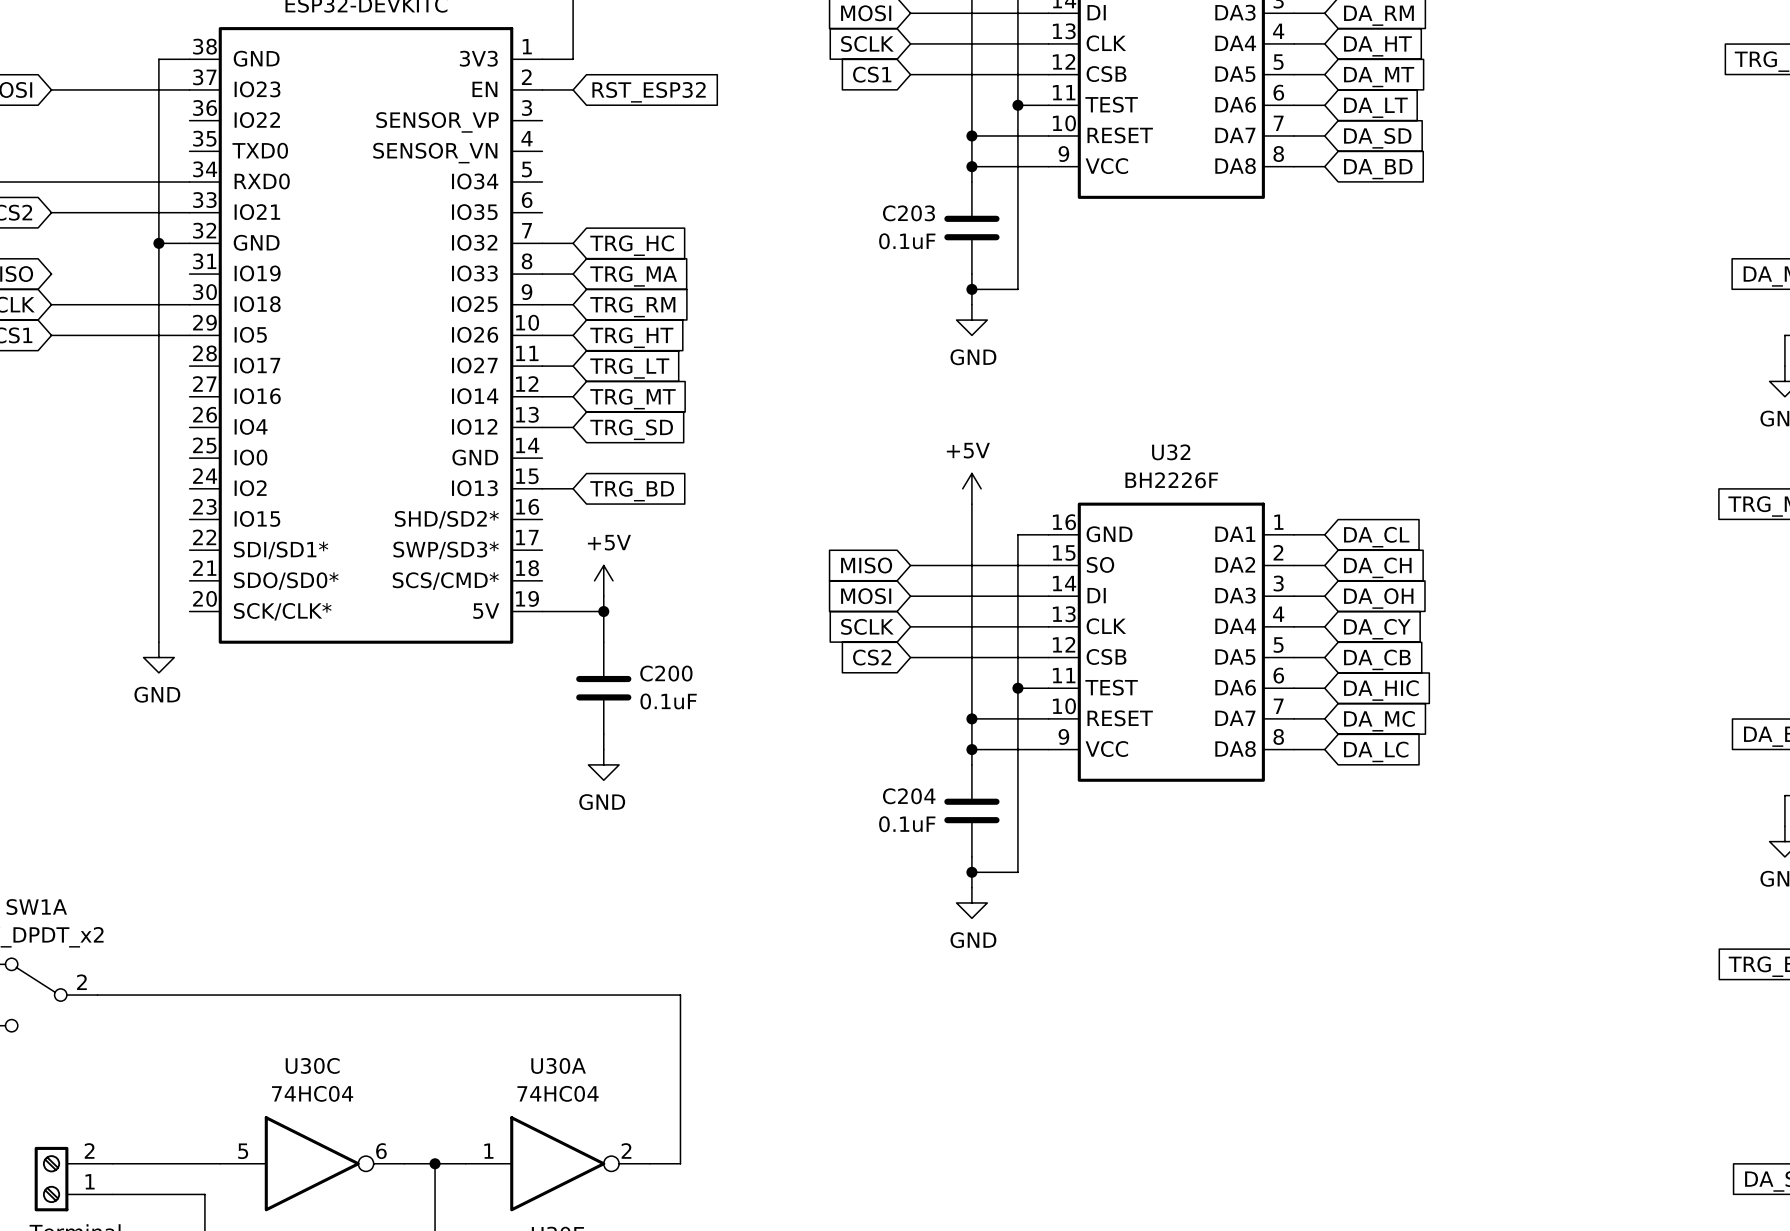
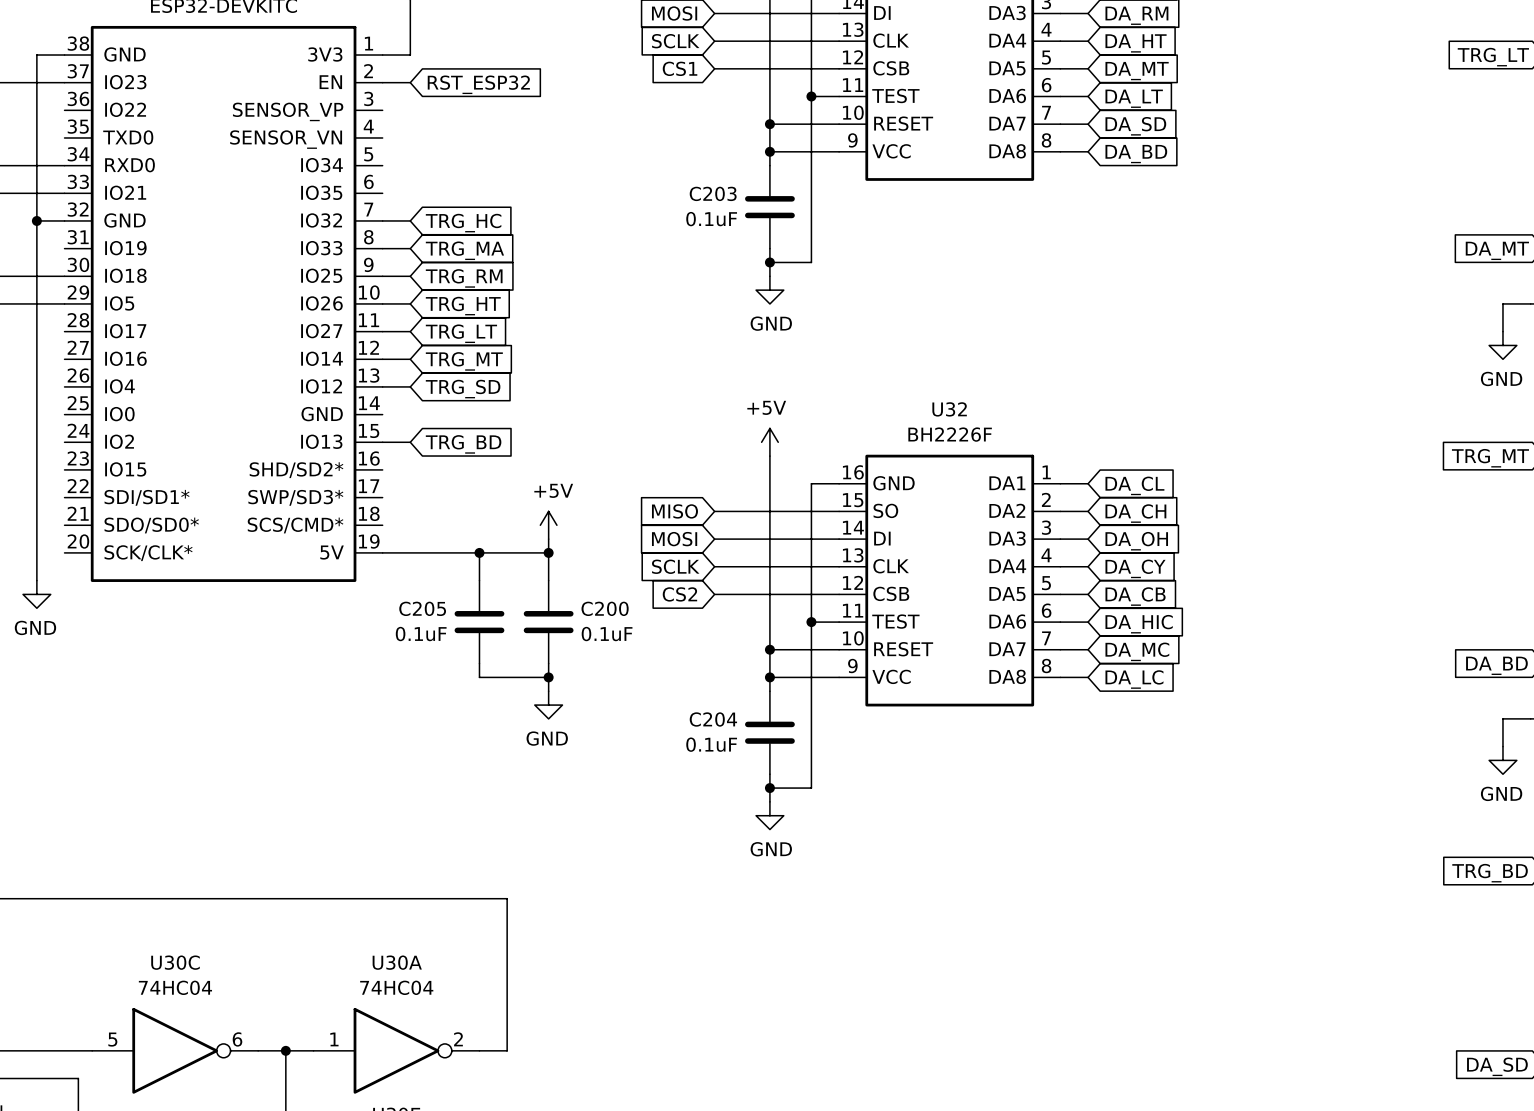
power symbol position: +5V (603, 580) -> +5V (548, 525)
wire: (603, 596) (603, 642) -> (548, 539) (548, 580)
wire: none -> (437, 552) (548, 552)
junction position: (603, 611) -> (479, 552)
wire: none -> (479, 552) (479, 580)
junction: none -> (548, 552)
C200 position: (603, 688) -> (548, 622)
C205: none -> 0.1uF (479, 622)
wire: (603, 734) (603, 749) -> none
wire: none -> (479, 663) (479, 677) (548, 677)
wire: none -> (548, 663) (548, 691)
junction: none -> (548, 677)
power symbol position: GND (603, 764) -> GND (548, 705)

